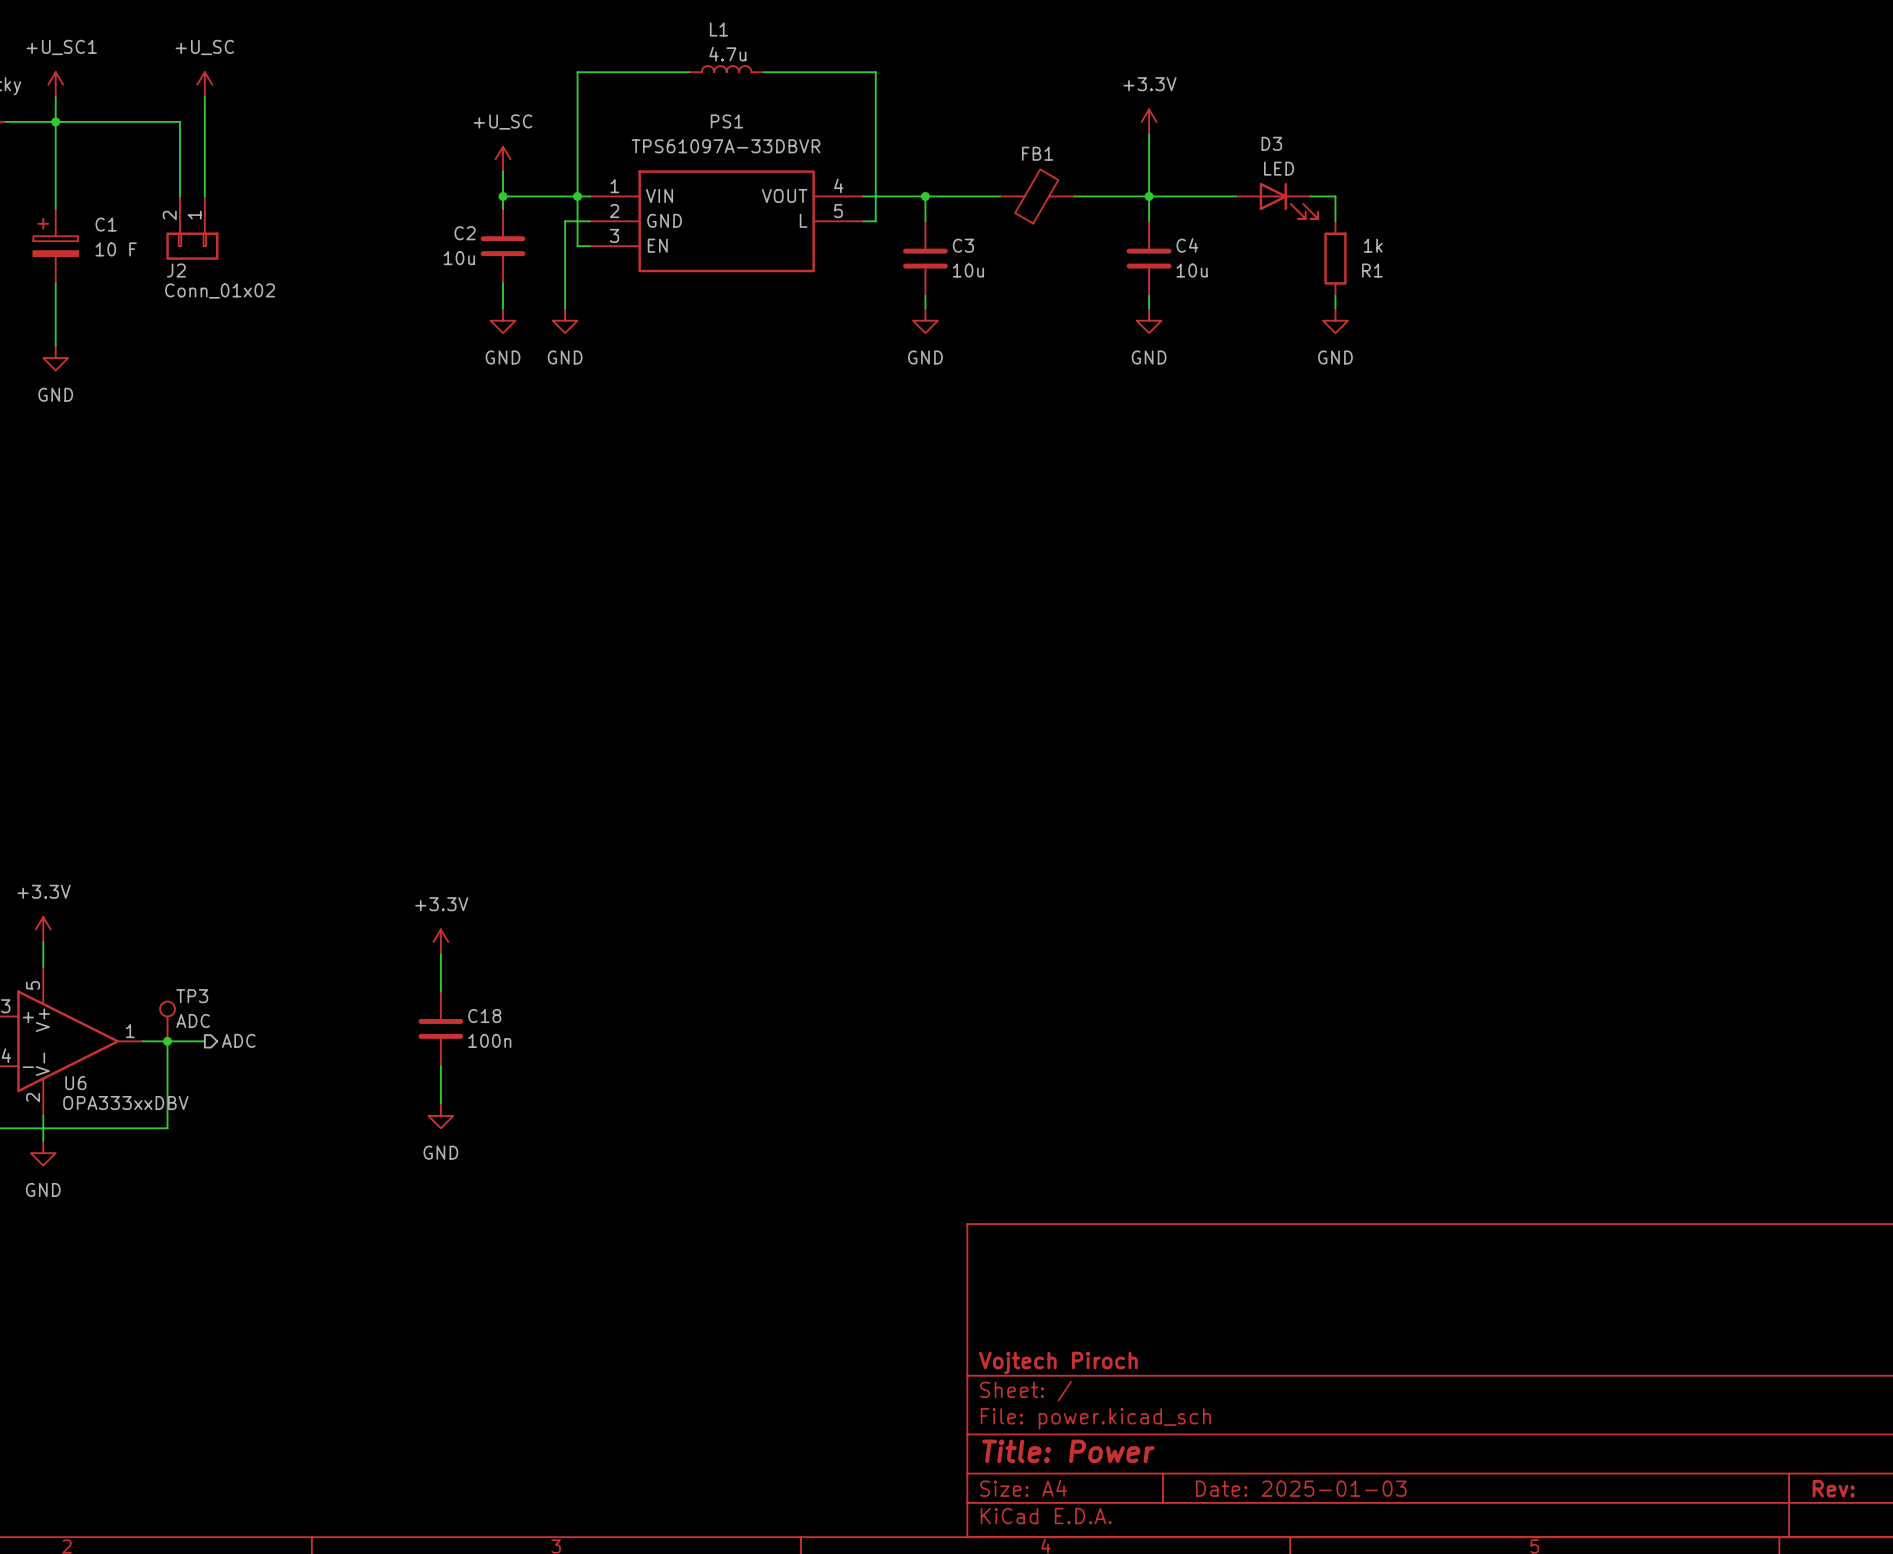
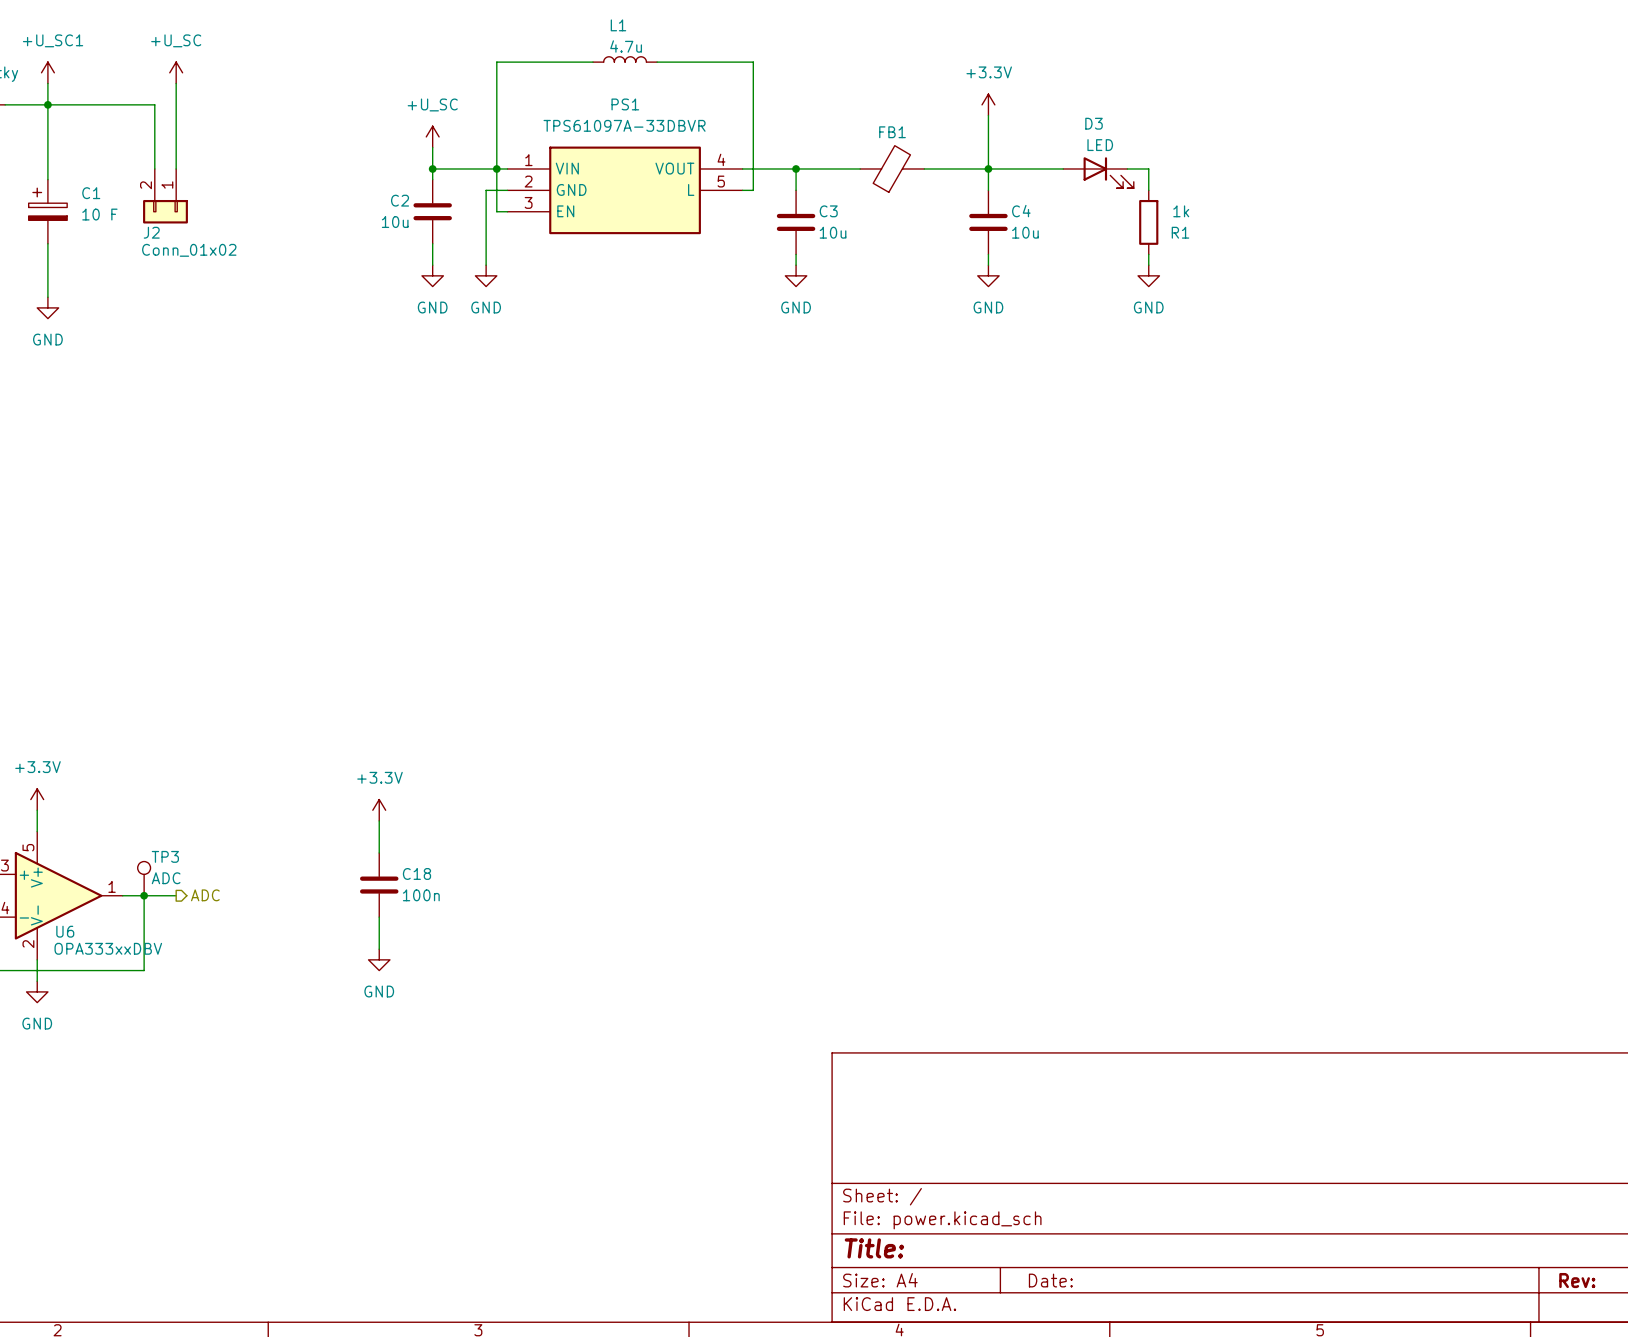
title block: Vojtech Piroch (1058, 1362) -> none
title block: Title: Power (1068, 1451) -> Title: (874, 1248)
title block: Date: 2025-01-03 (1301, 1488) -> Date: (1050, 1280)

